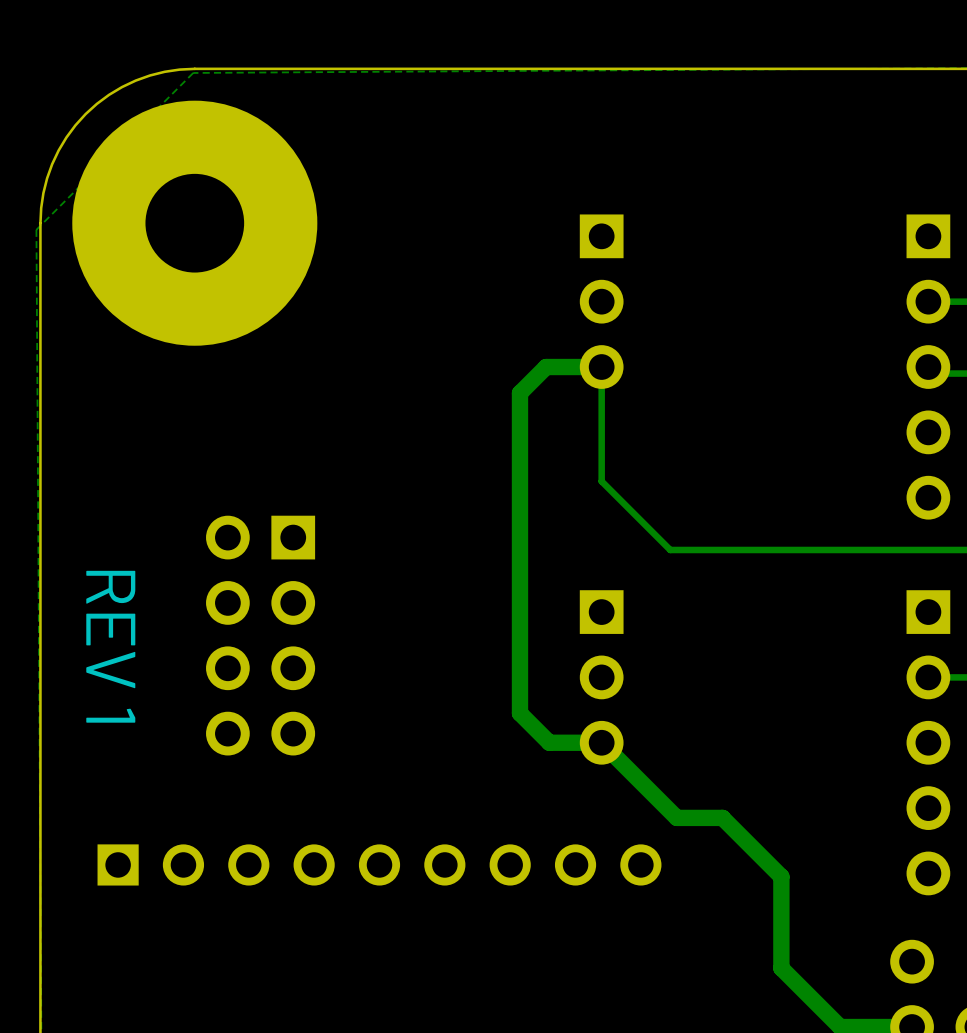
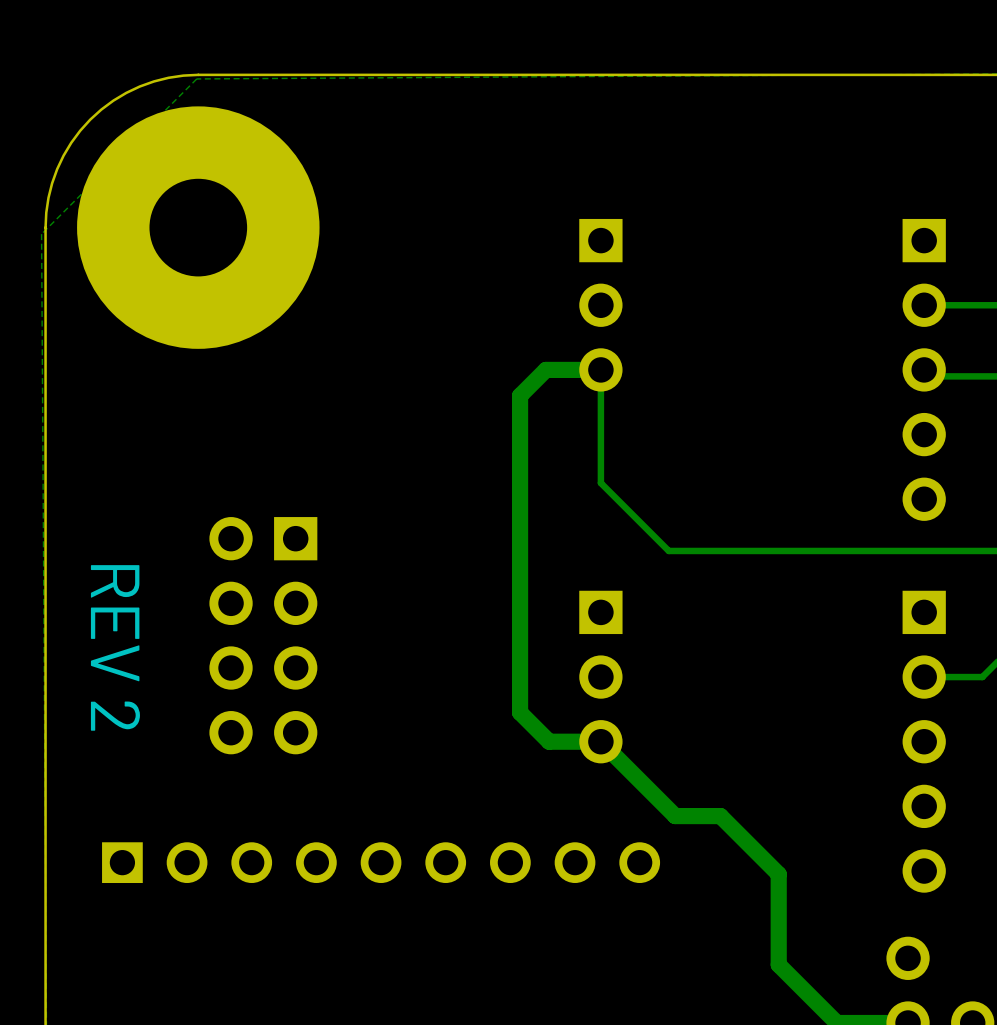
text: REV 1 (110, 646) -> REV 2 (115, 647)

